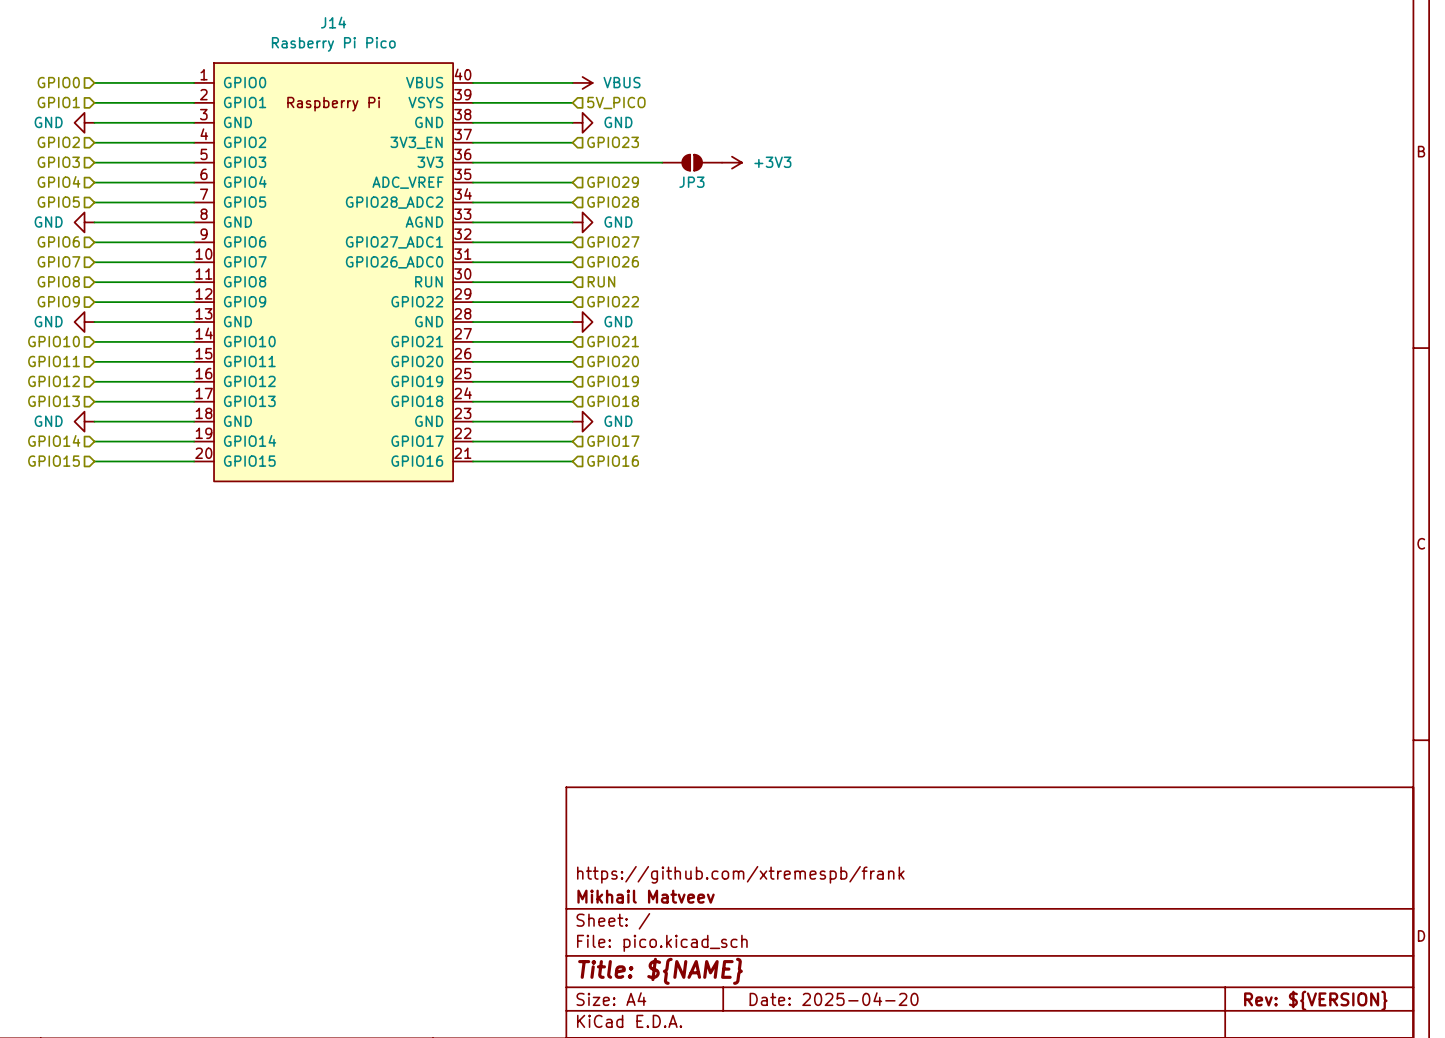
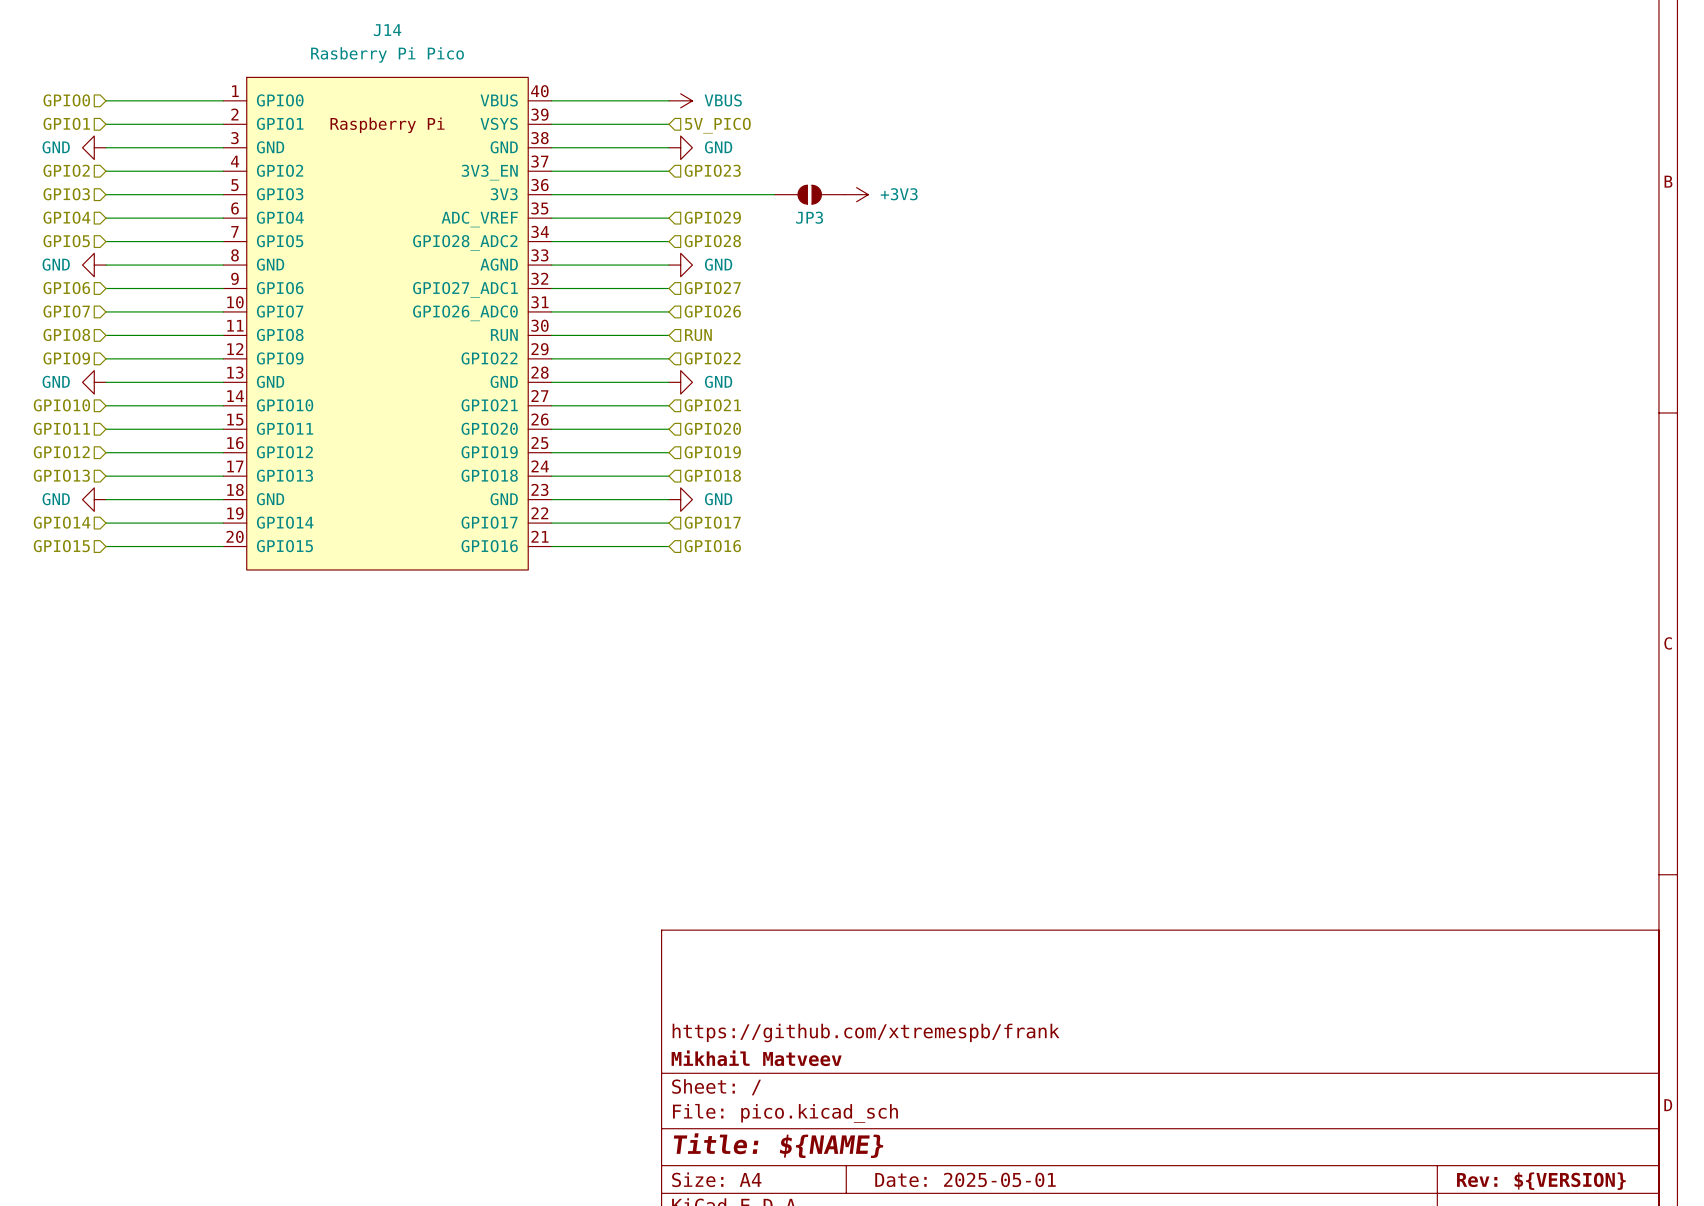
title block: Date: 2025-04-20 (834, 999) -> Date: 2025-05-01 (965, 1179)

